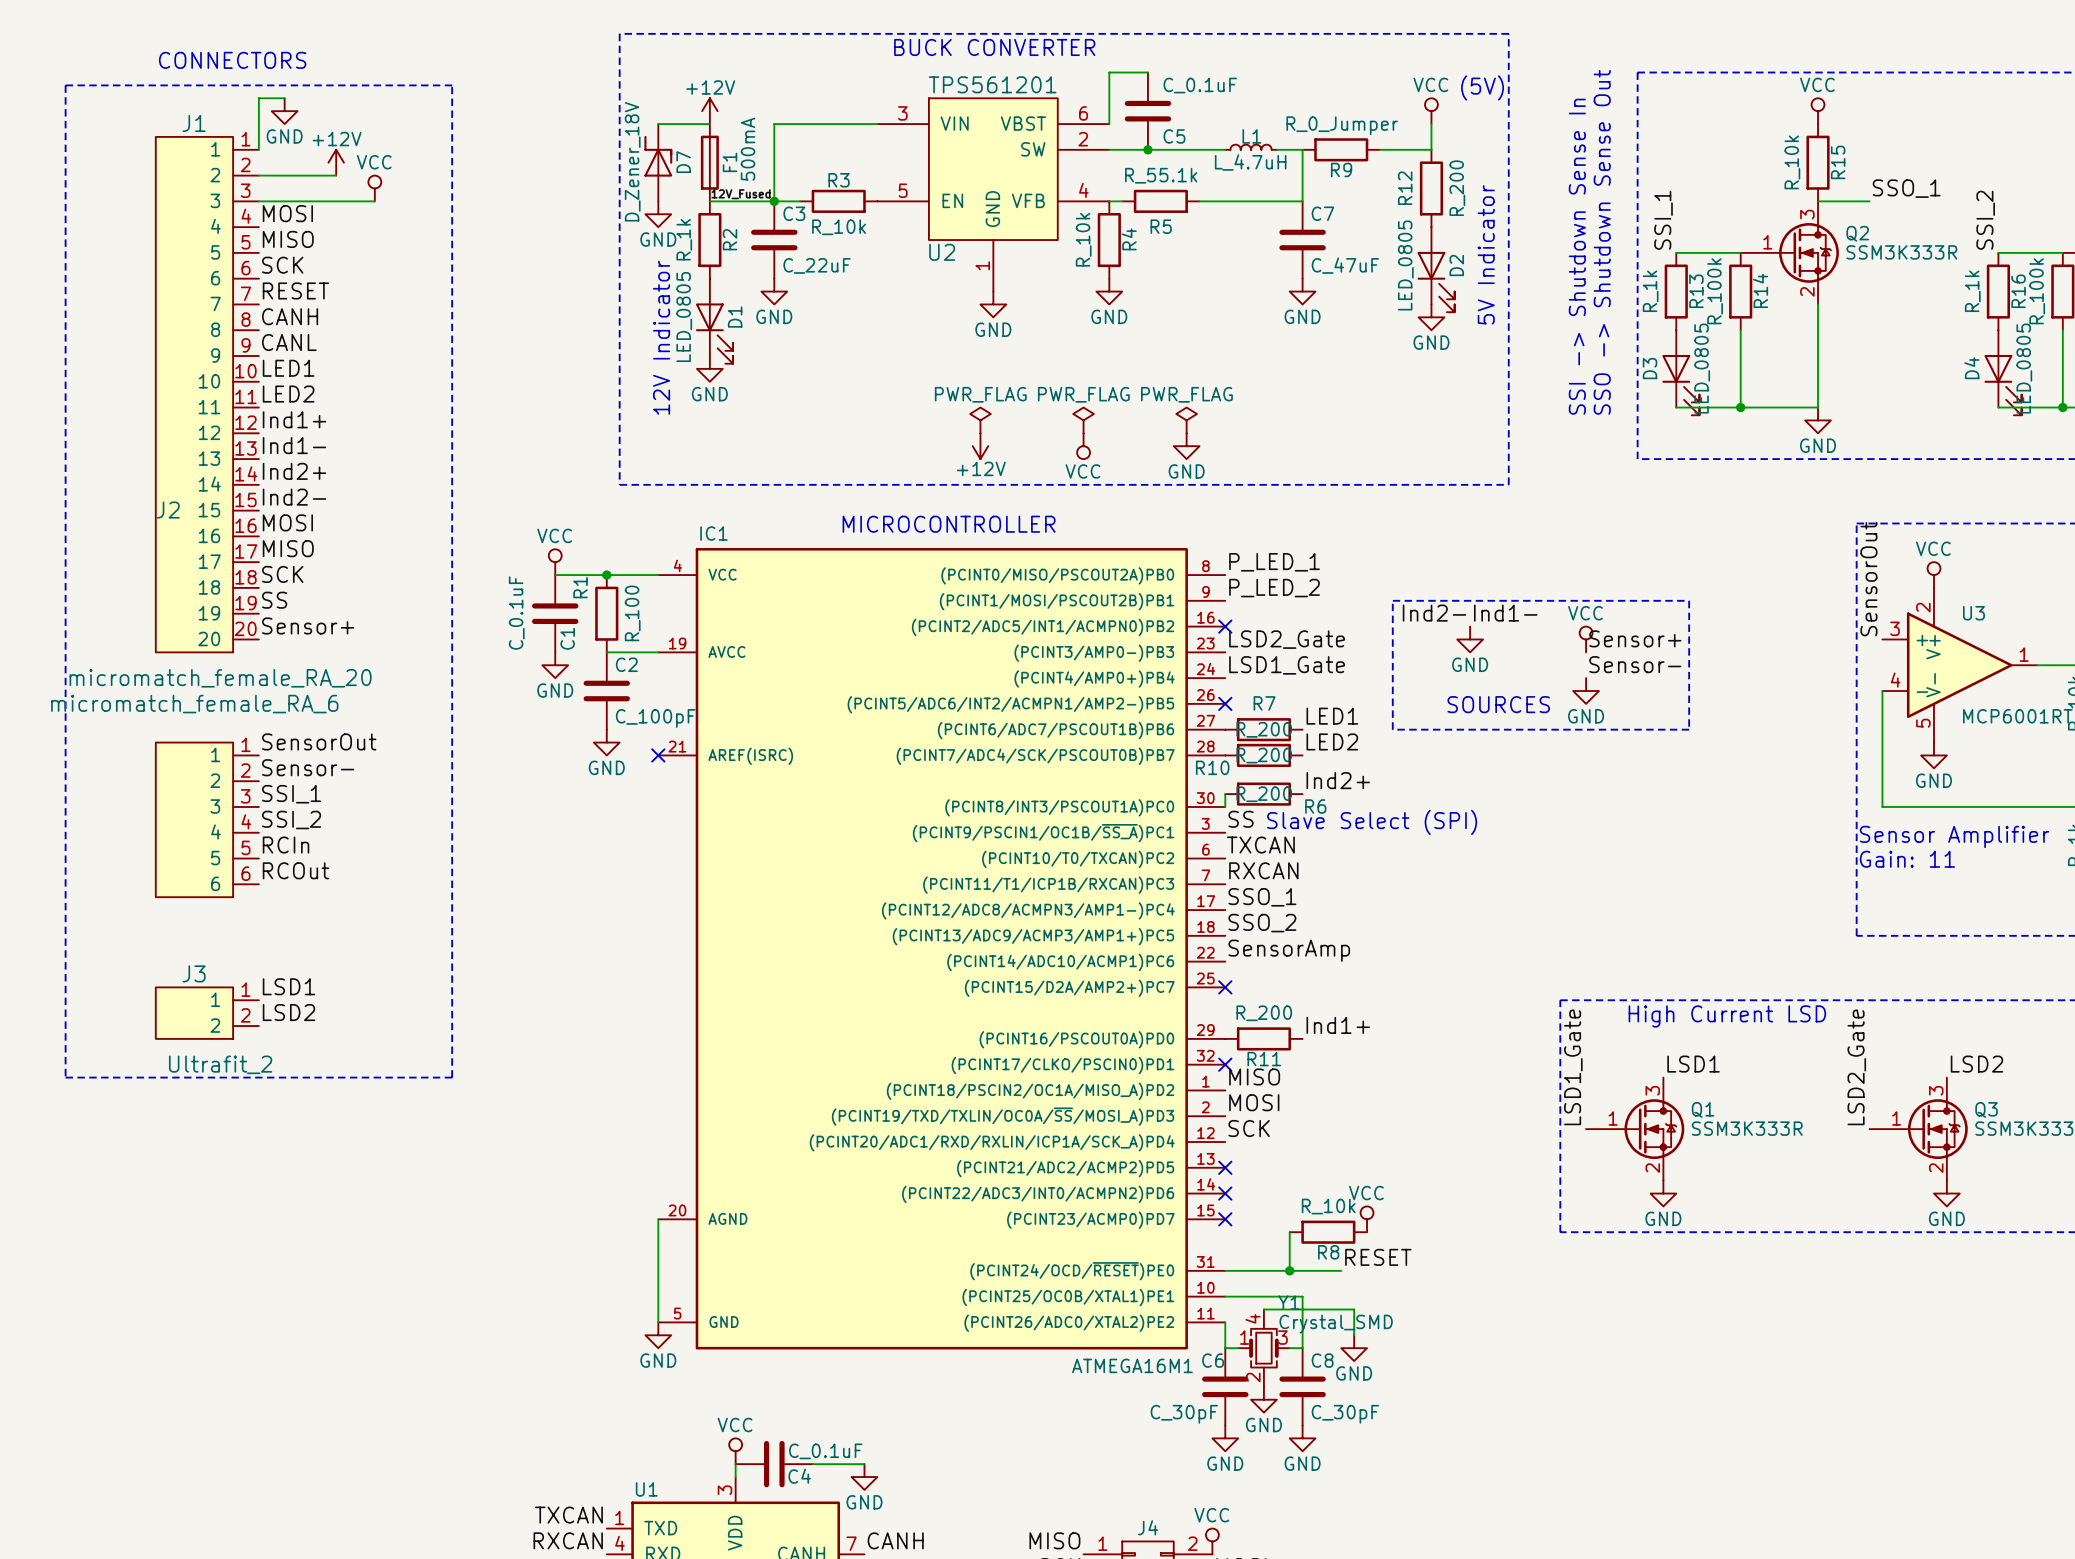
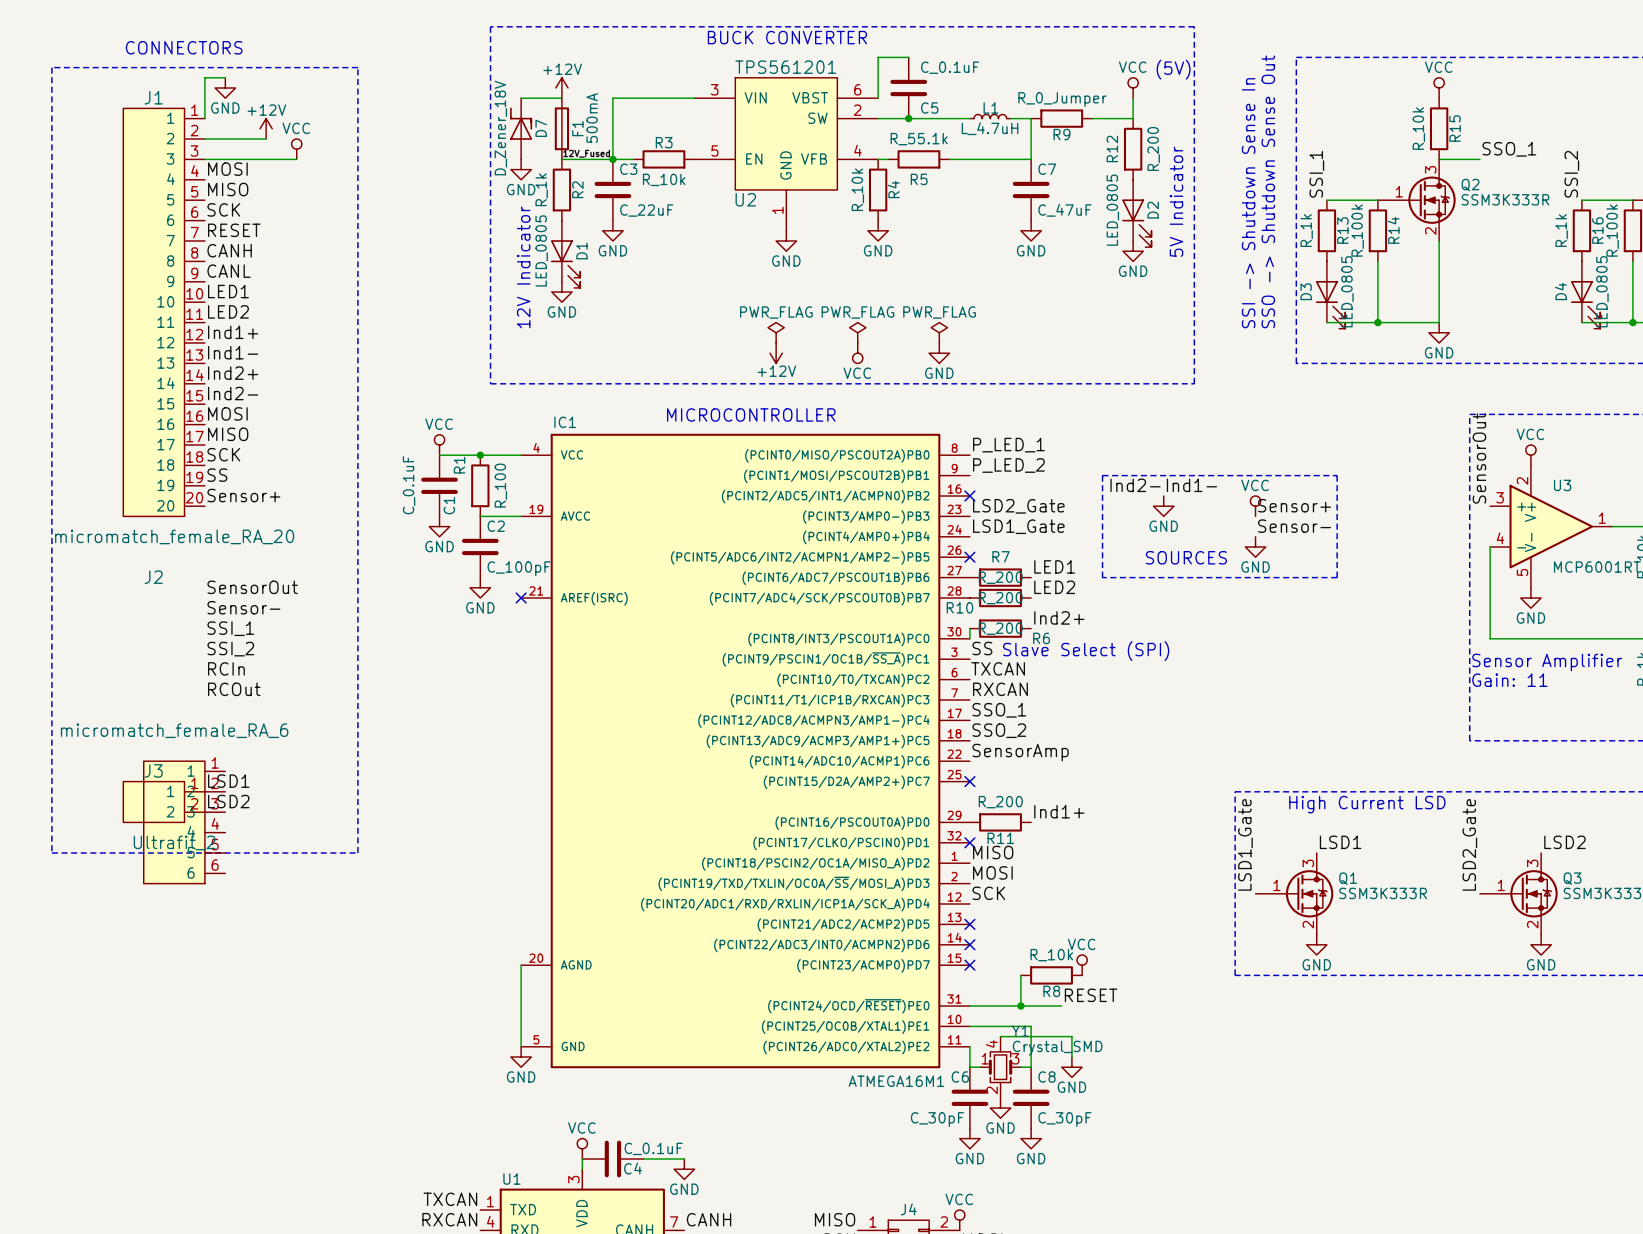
J2 position: (207, 819) -> (184, 822)

